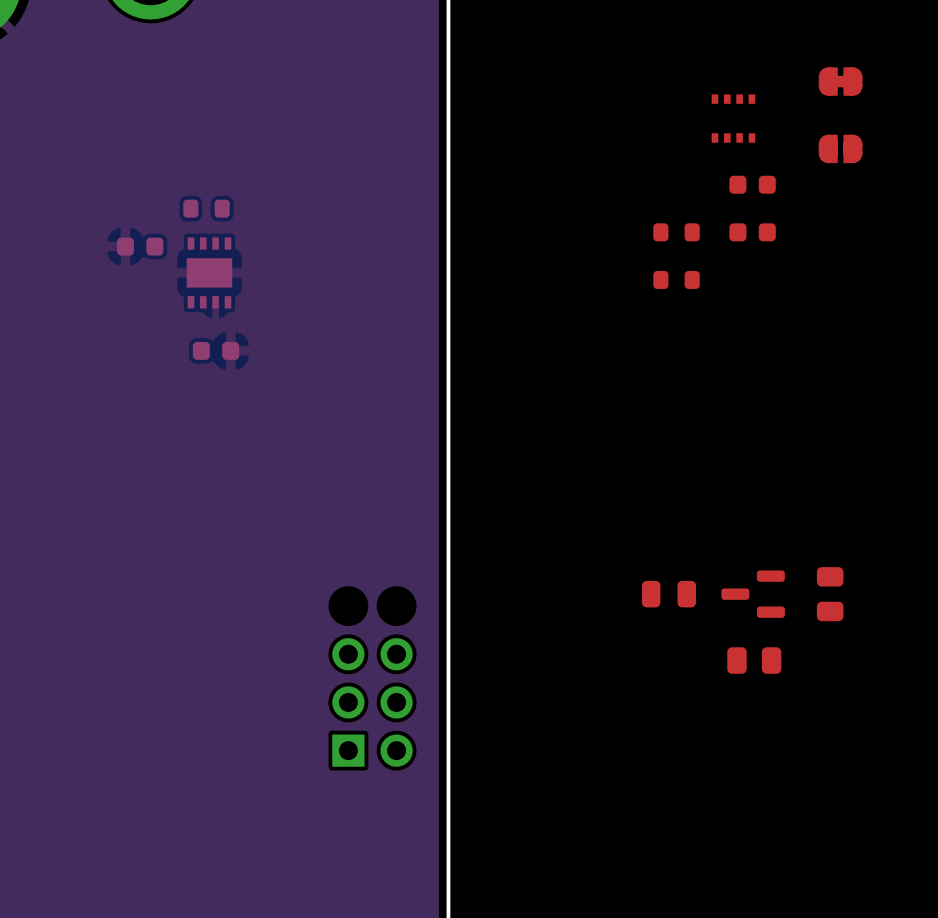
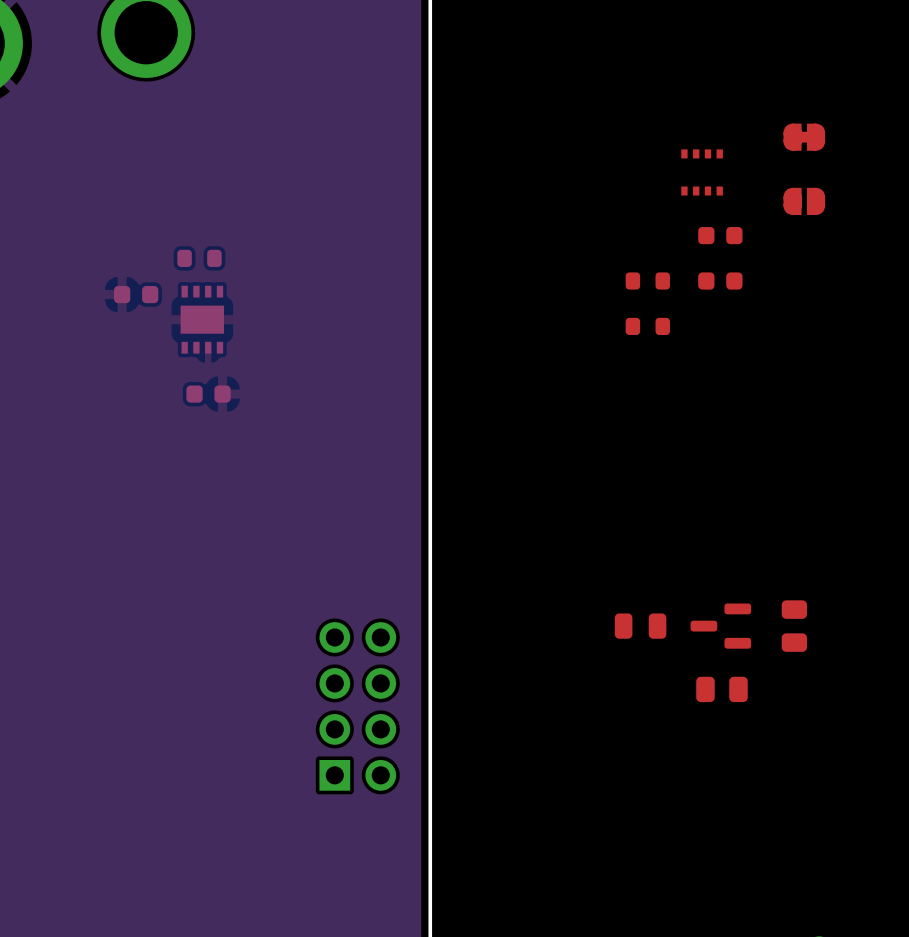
part: none -> (357, 706)

